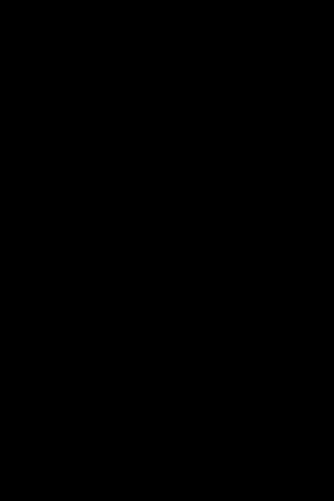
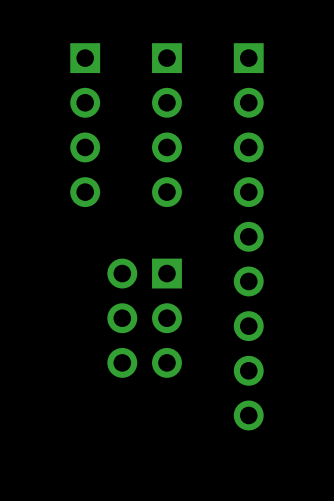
part: none -> (85, 125)
part: none -> (166, 125)
part: none -> (248, 236)
part: none -> (144, 318)

